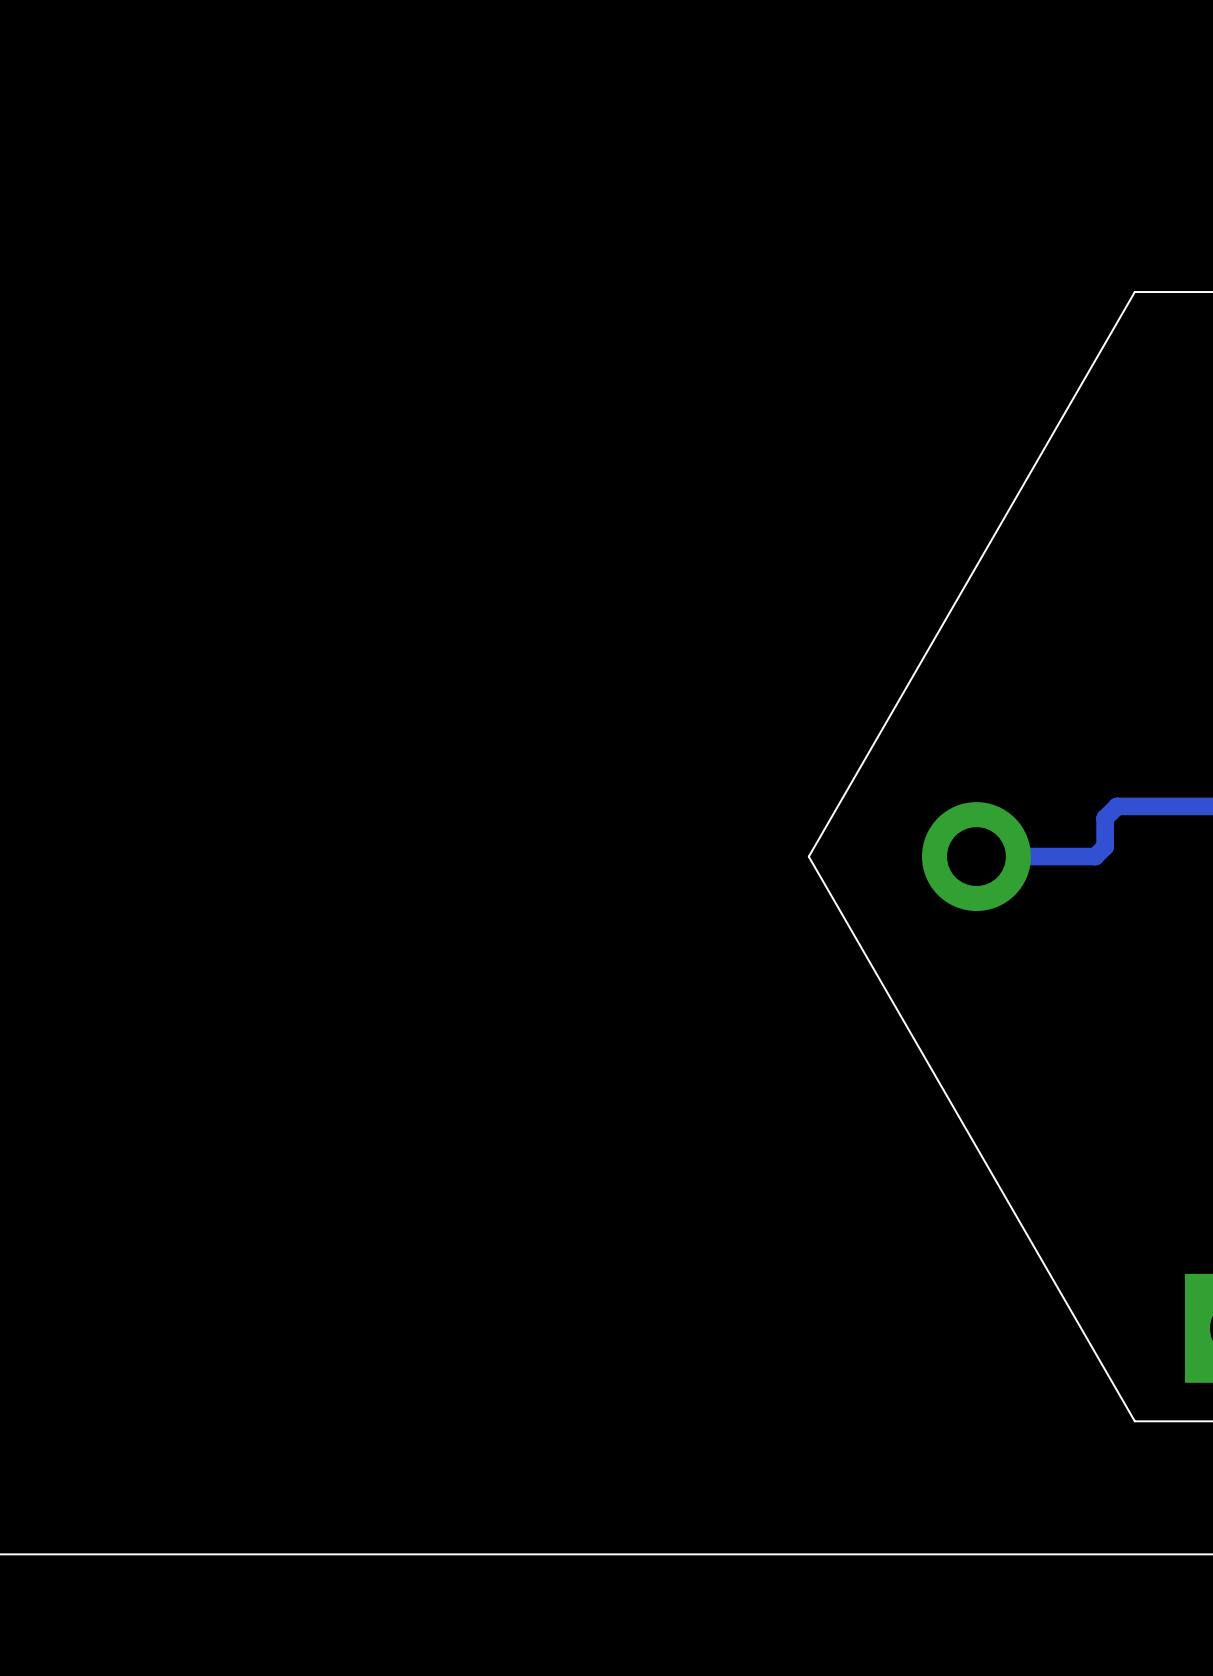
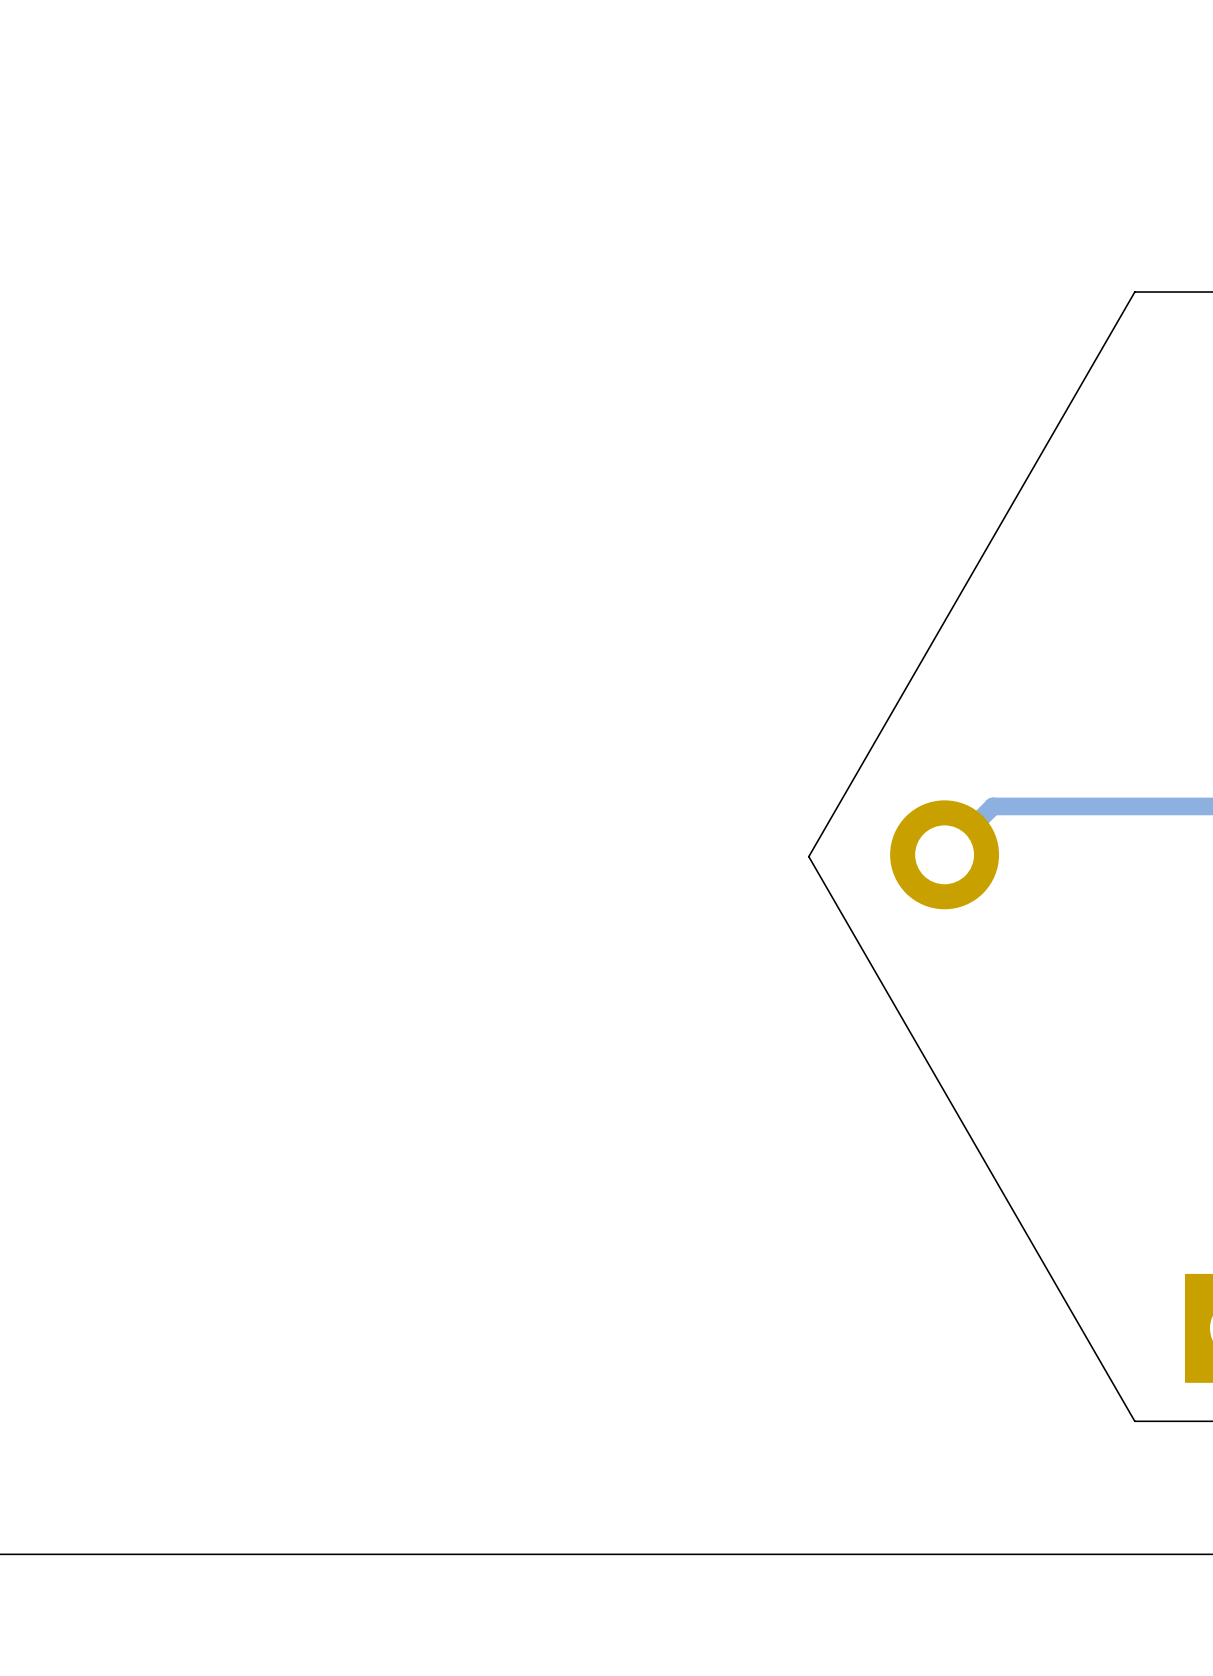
bottom track: (1117, 806) (1105, 818) (1105, 846) (1095, 856) (976, 856) -> (1117, 806) (992, 806) (944, 854)
part position: (976, 856) -> (944, 854)

